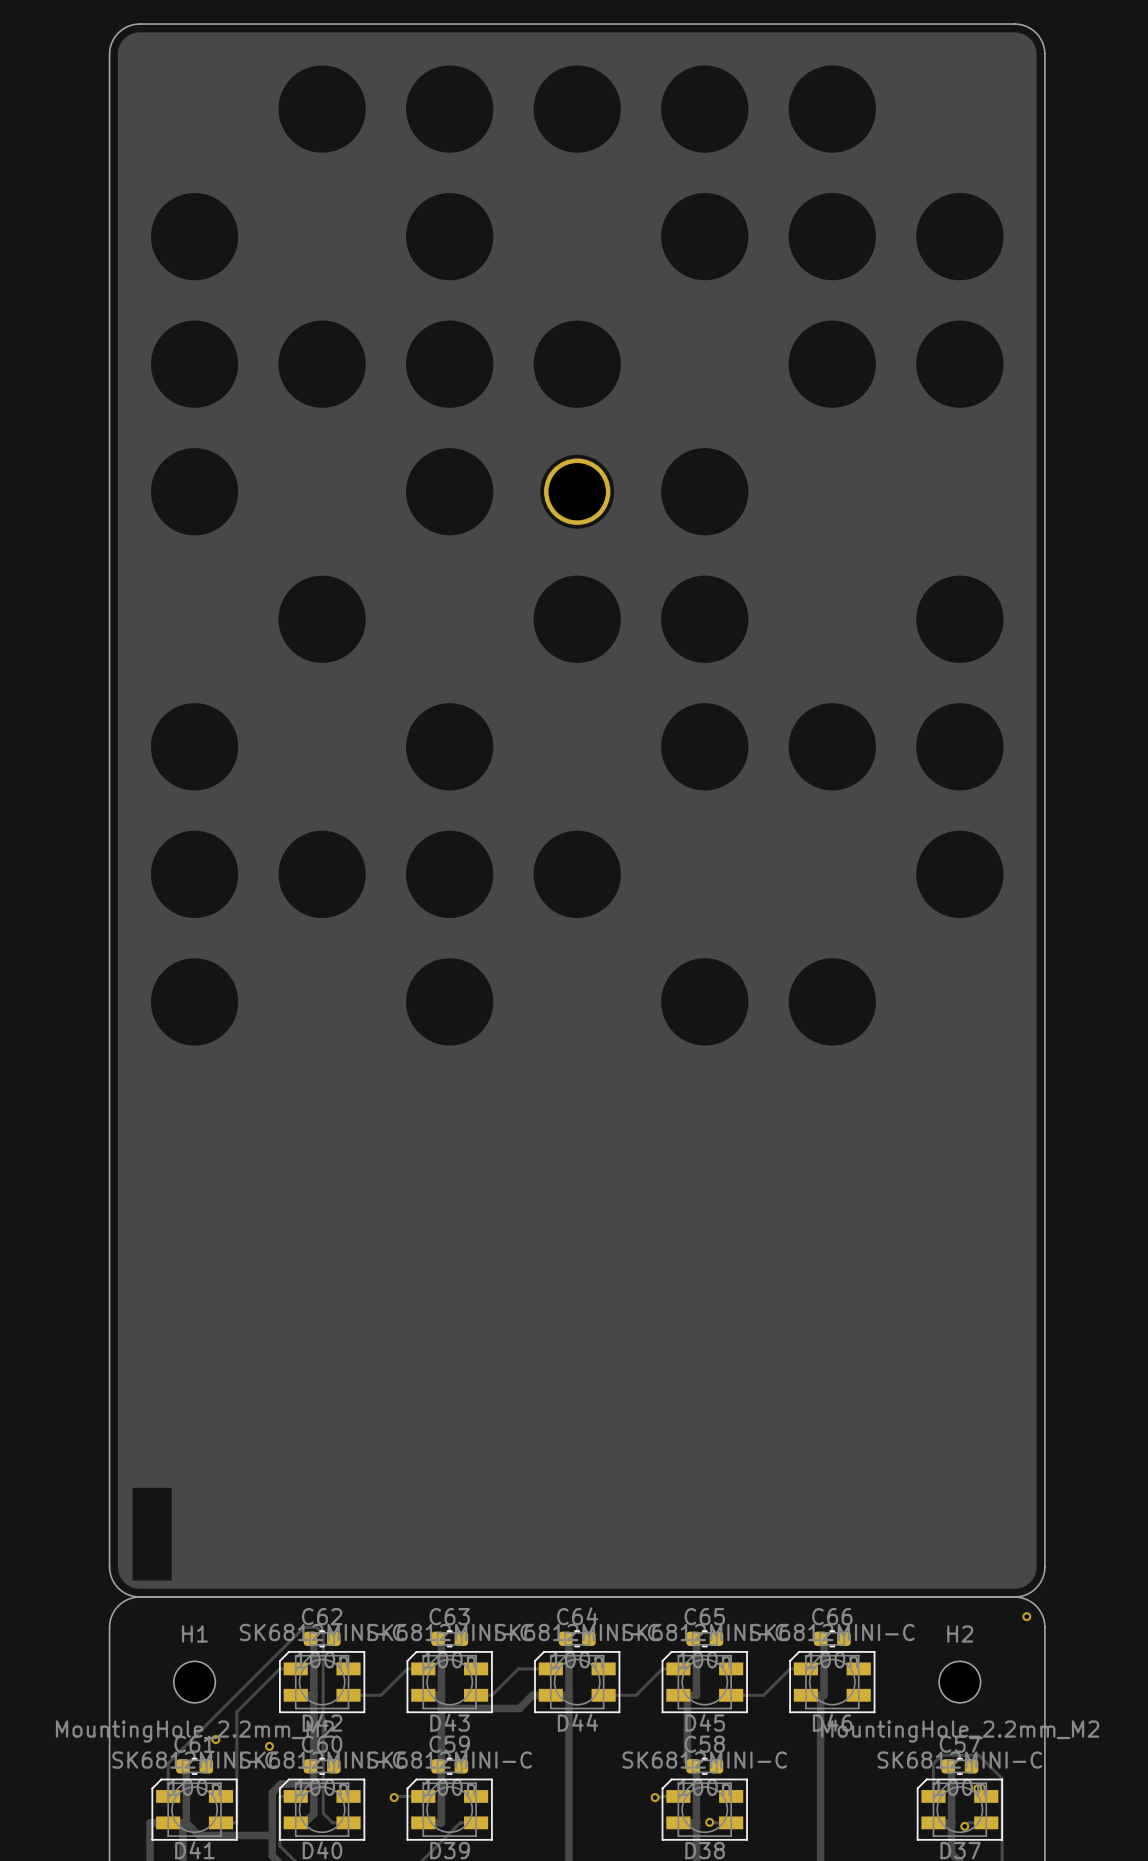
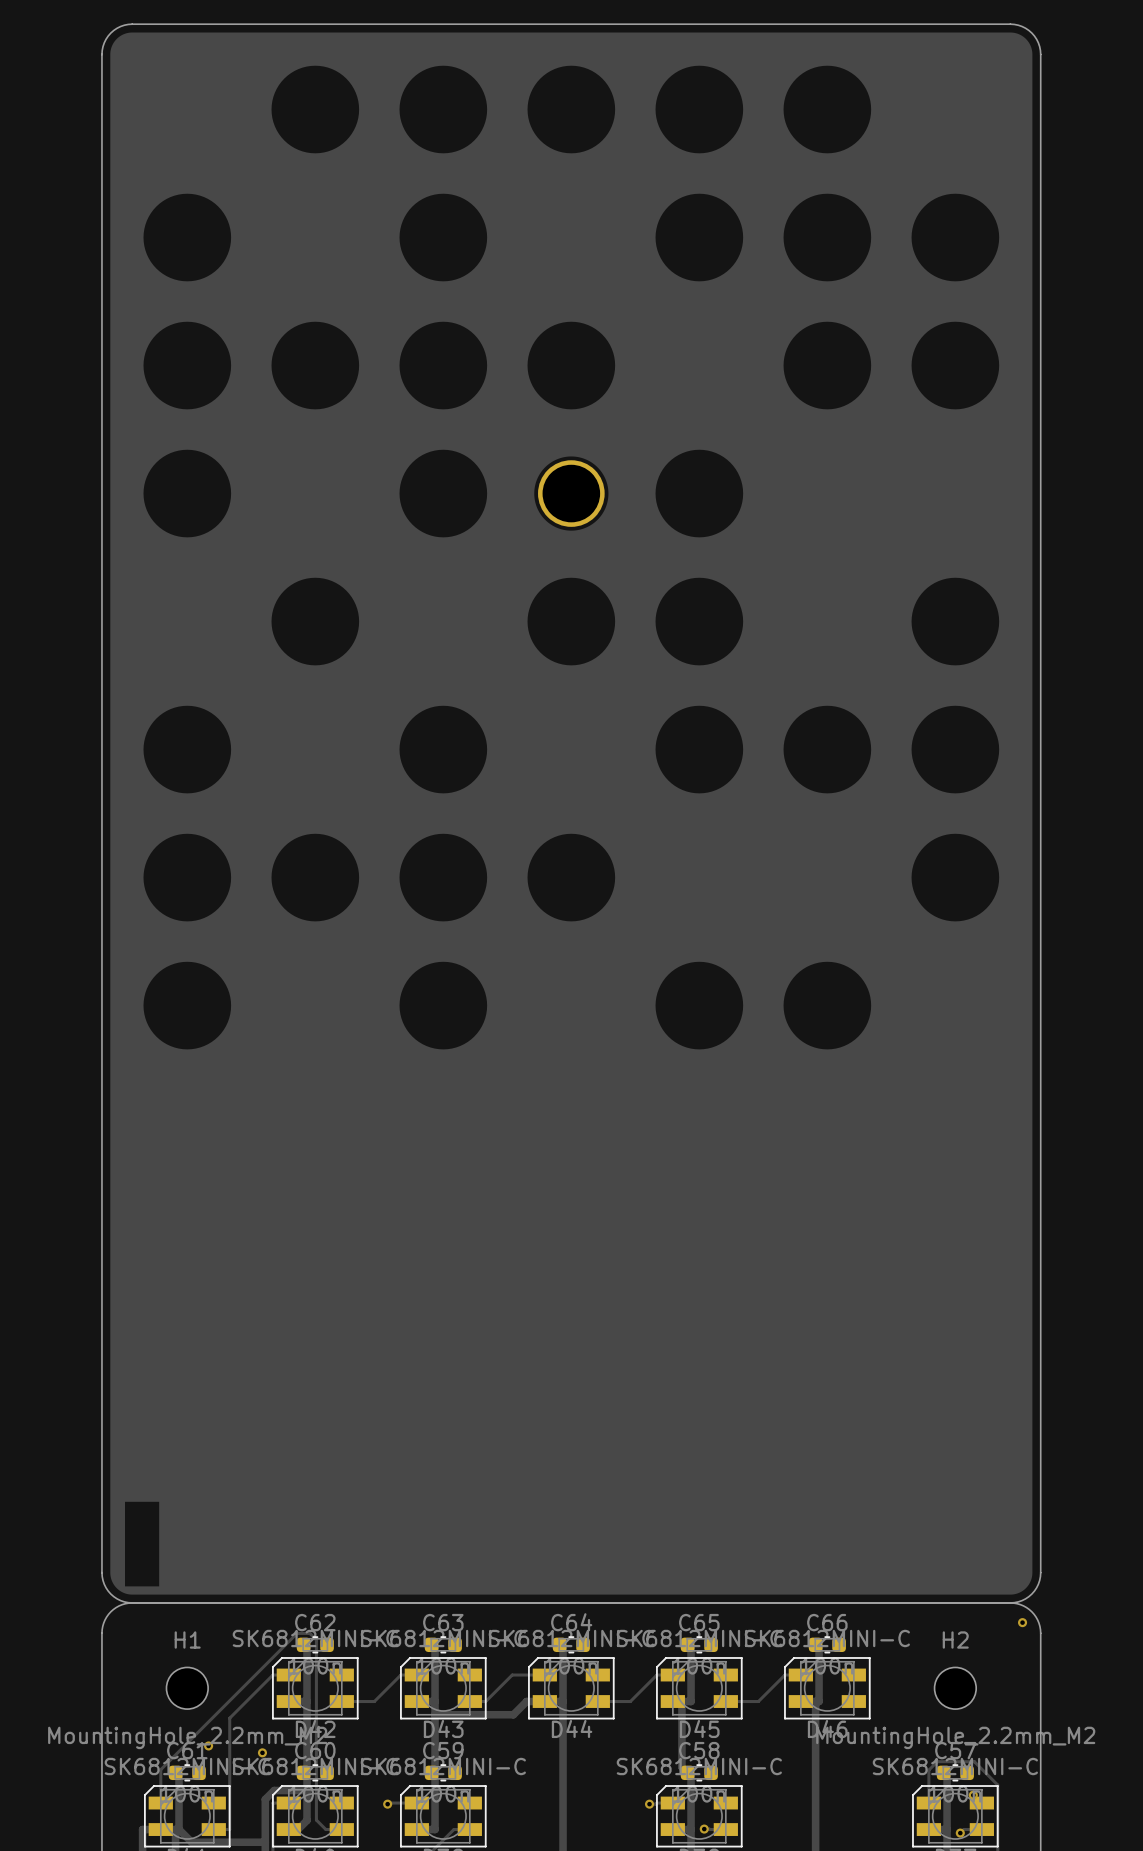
drawing shape: [117, 32, 1037, 1589] -> [110, 32, 1033, 1595]

